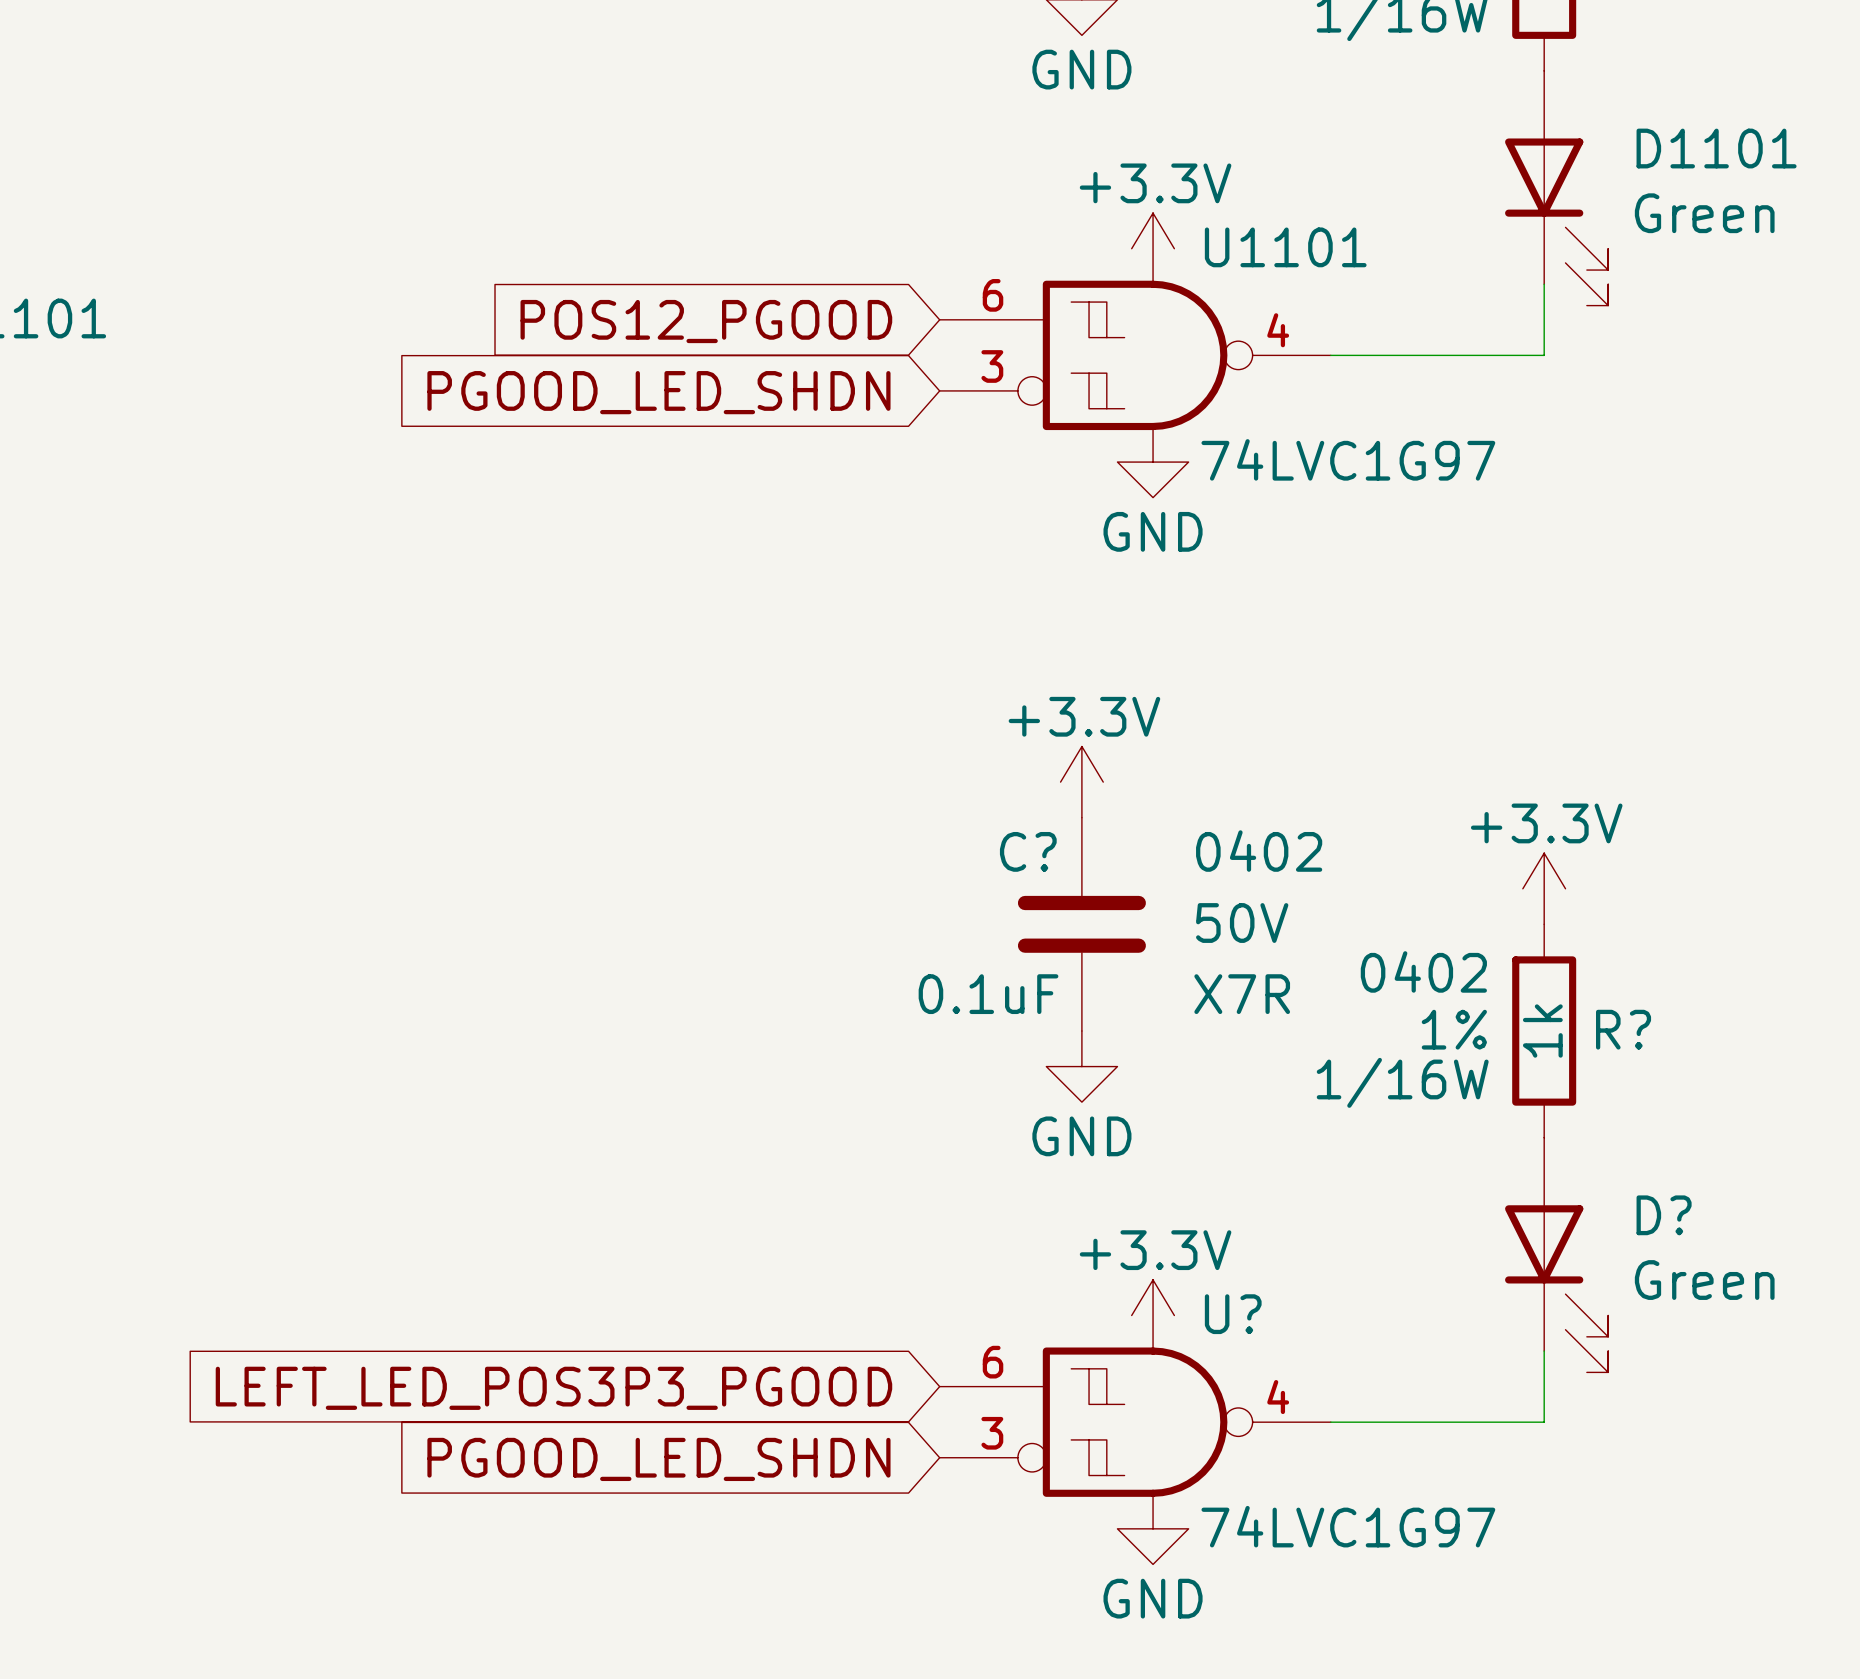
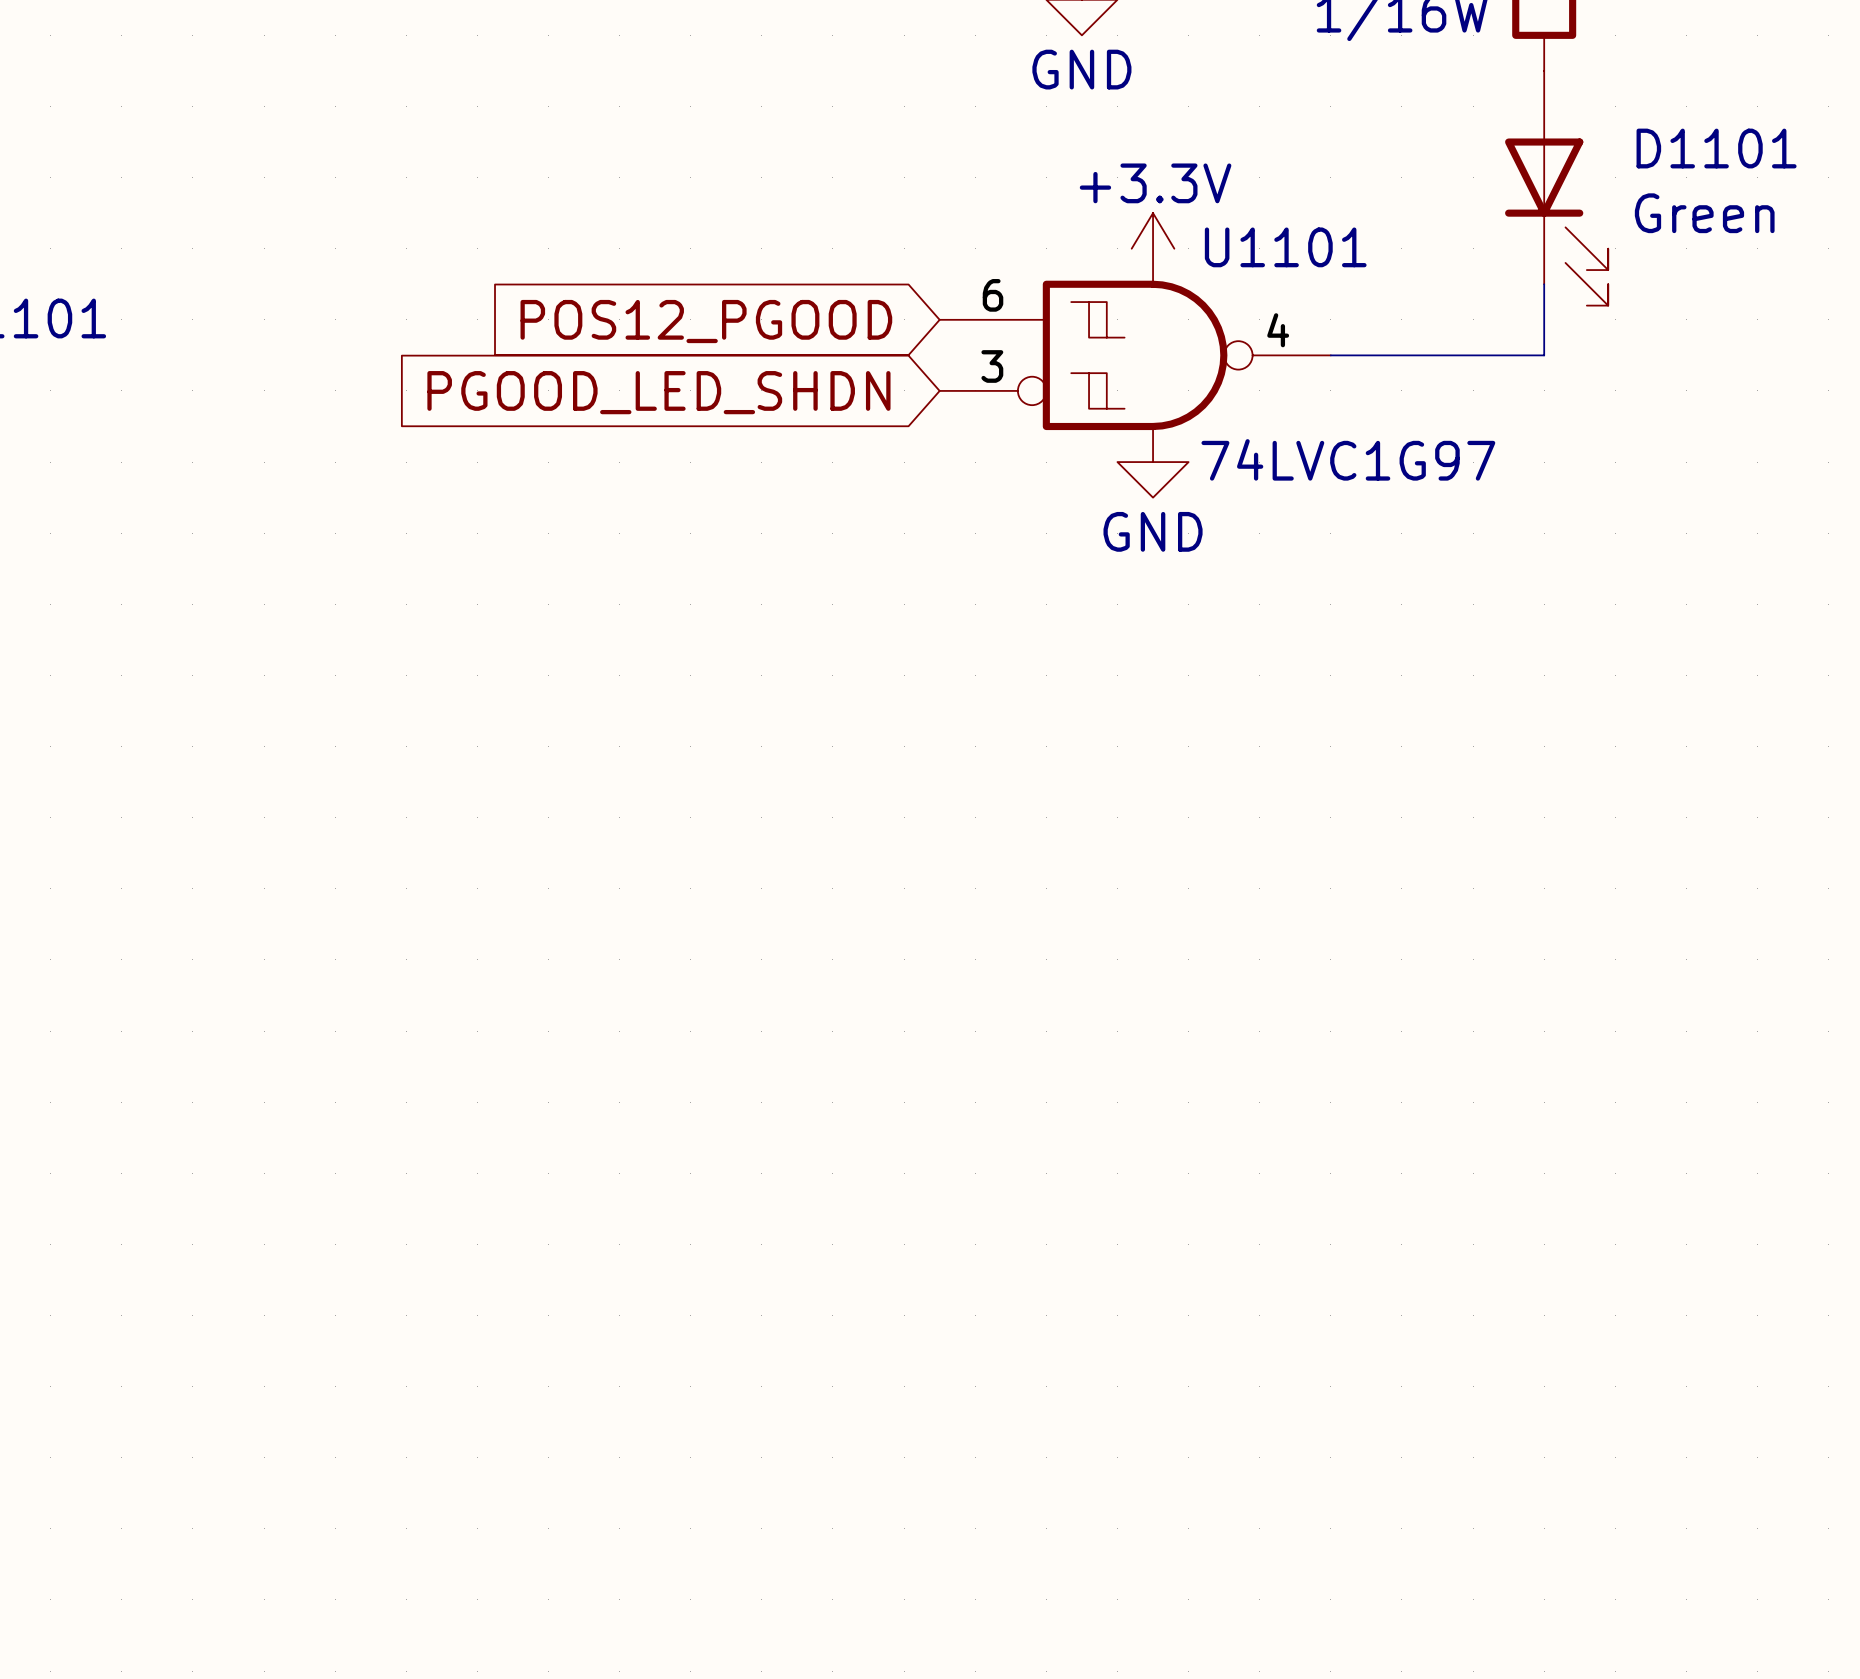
power symbol: +3.3V (1081, 782) -> none
power symbol: +3.3V (1544, 888) -> none
C?: 0.1uF (1081, 924) -> none
R?: 1k (1544, 1031) -> none
power symbol: GND (1081, 1066) -> none
D?: Green (1556, 1255) -> none
power symbol: +3.3V (1153, 1315) -> none
wire: (1544, 1351) (1544, 1422) (1330, 1422) -> none
global label: LEFT_LED_POS3P3_PGOOD (553, 1388) -> none
U?: 74LVC1G97 (1135, 1422) -> none
global label: PGOOD_LED_SHDN (658, 1459) -> none
power symbol: GND (1153, 1528) -> none

